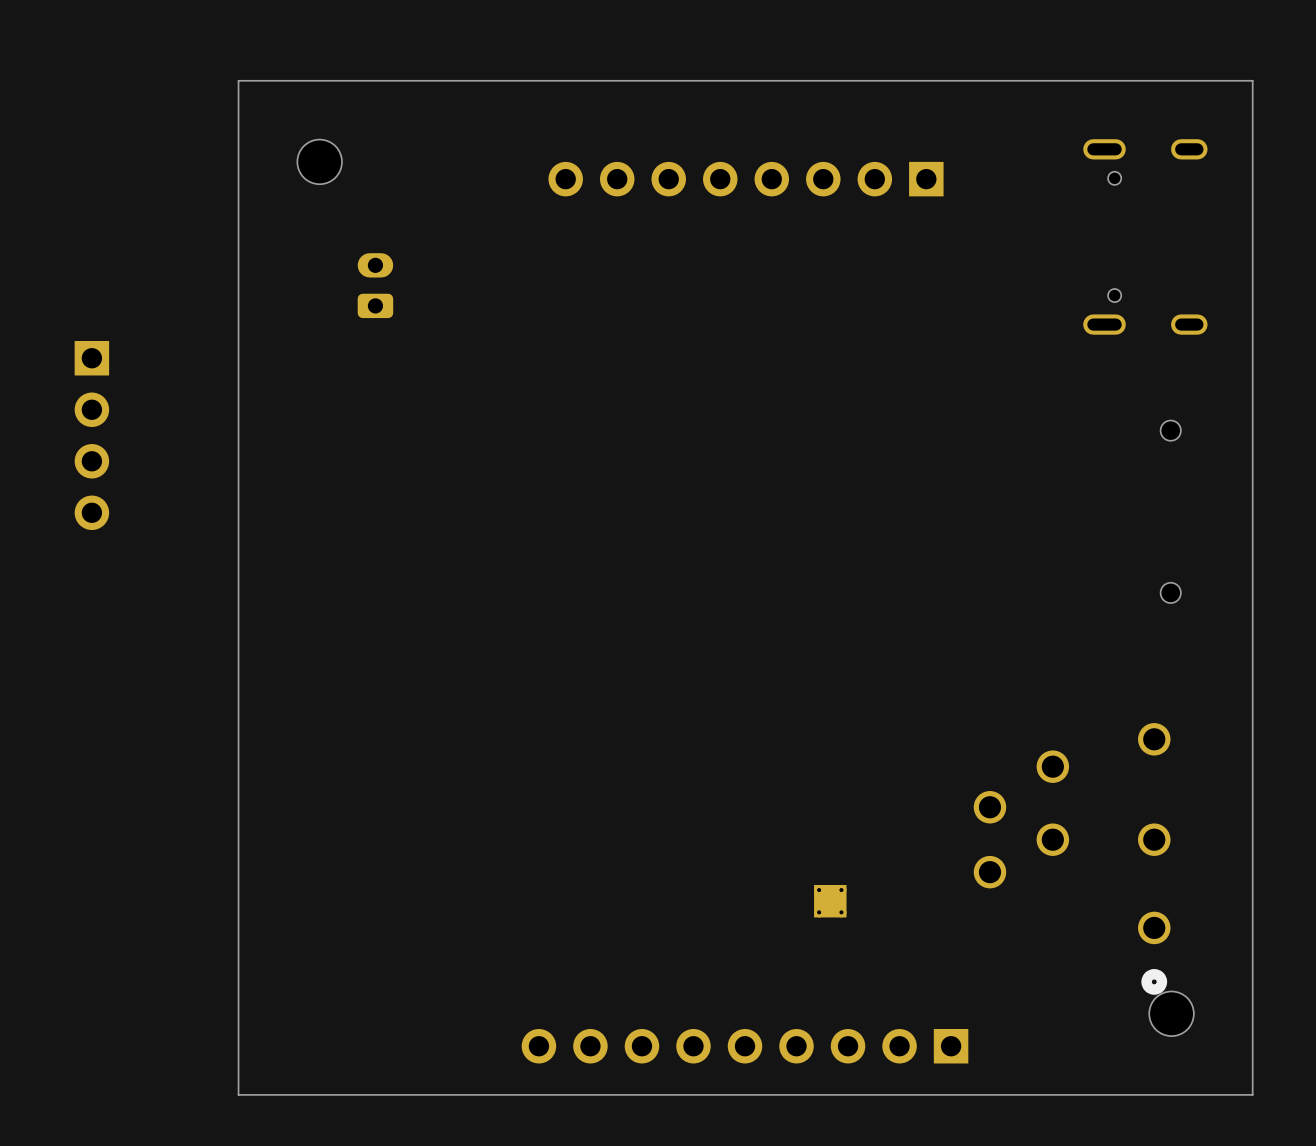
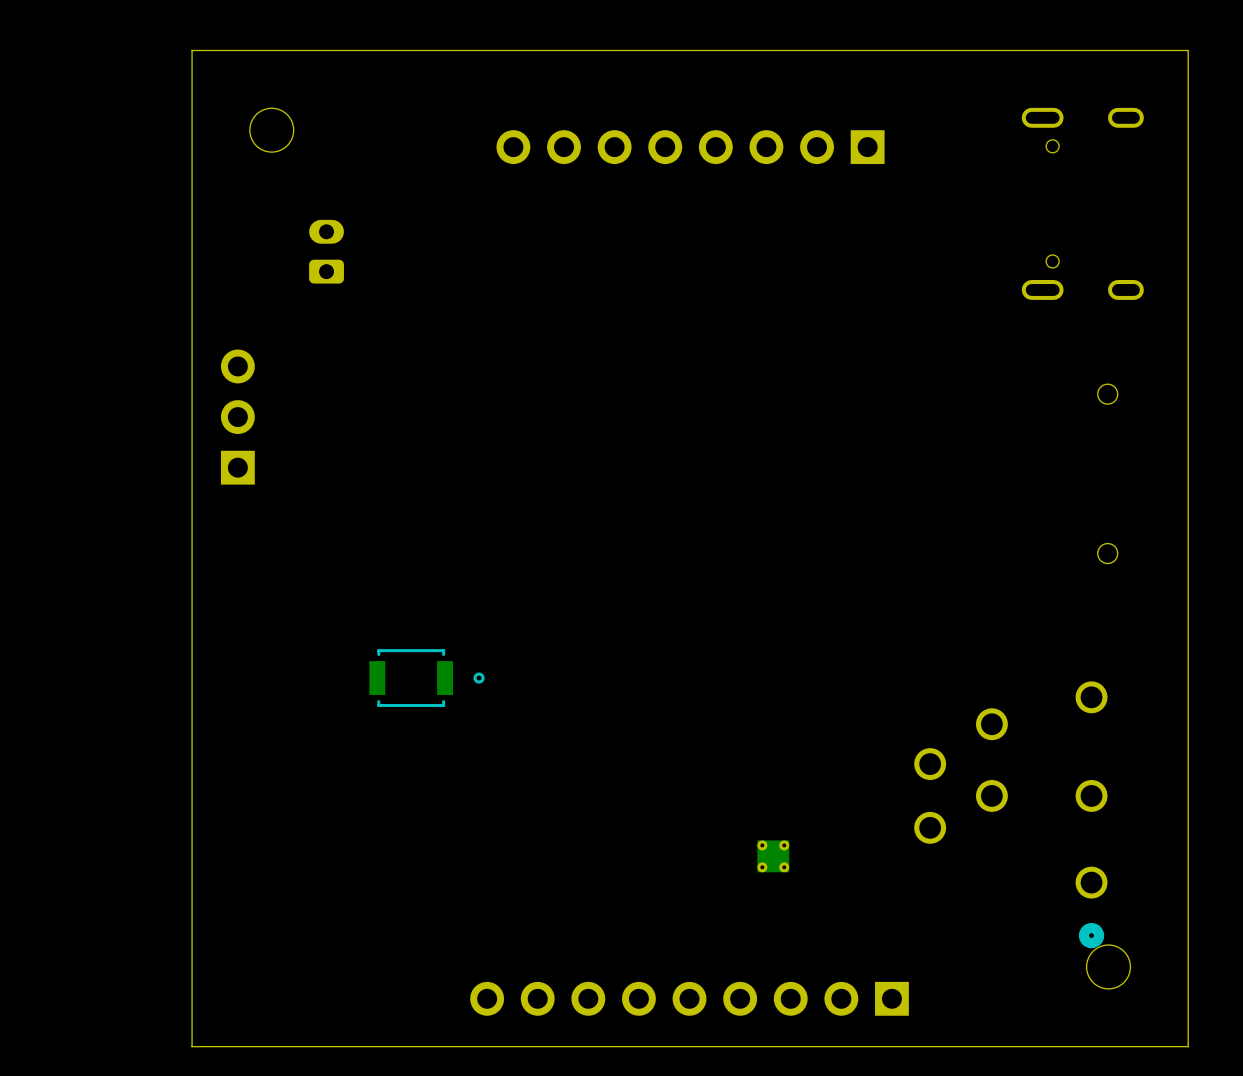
part: (91, 435) -> none
part: none -> (237, 417)
part: none -> (426, 678)

